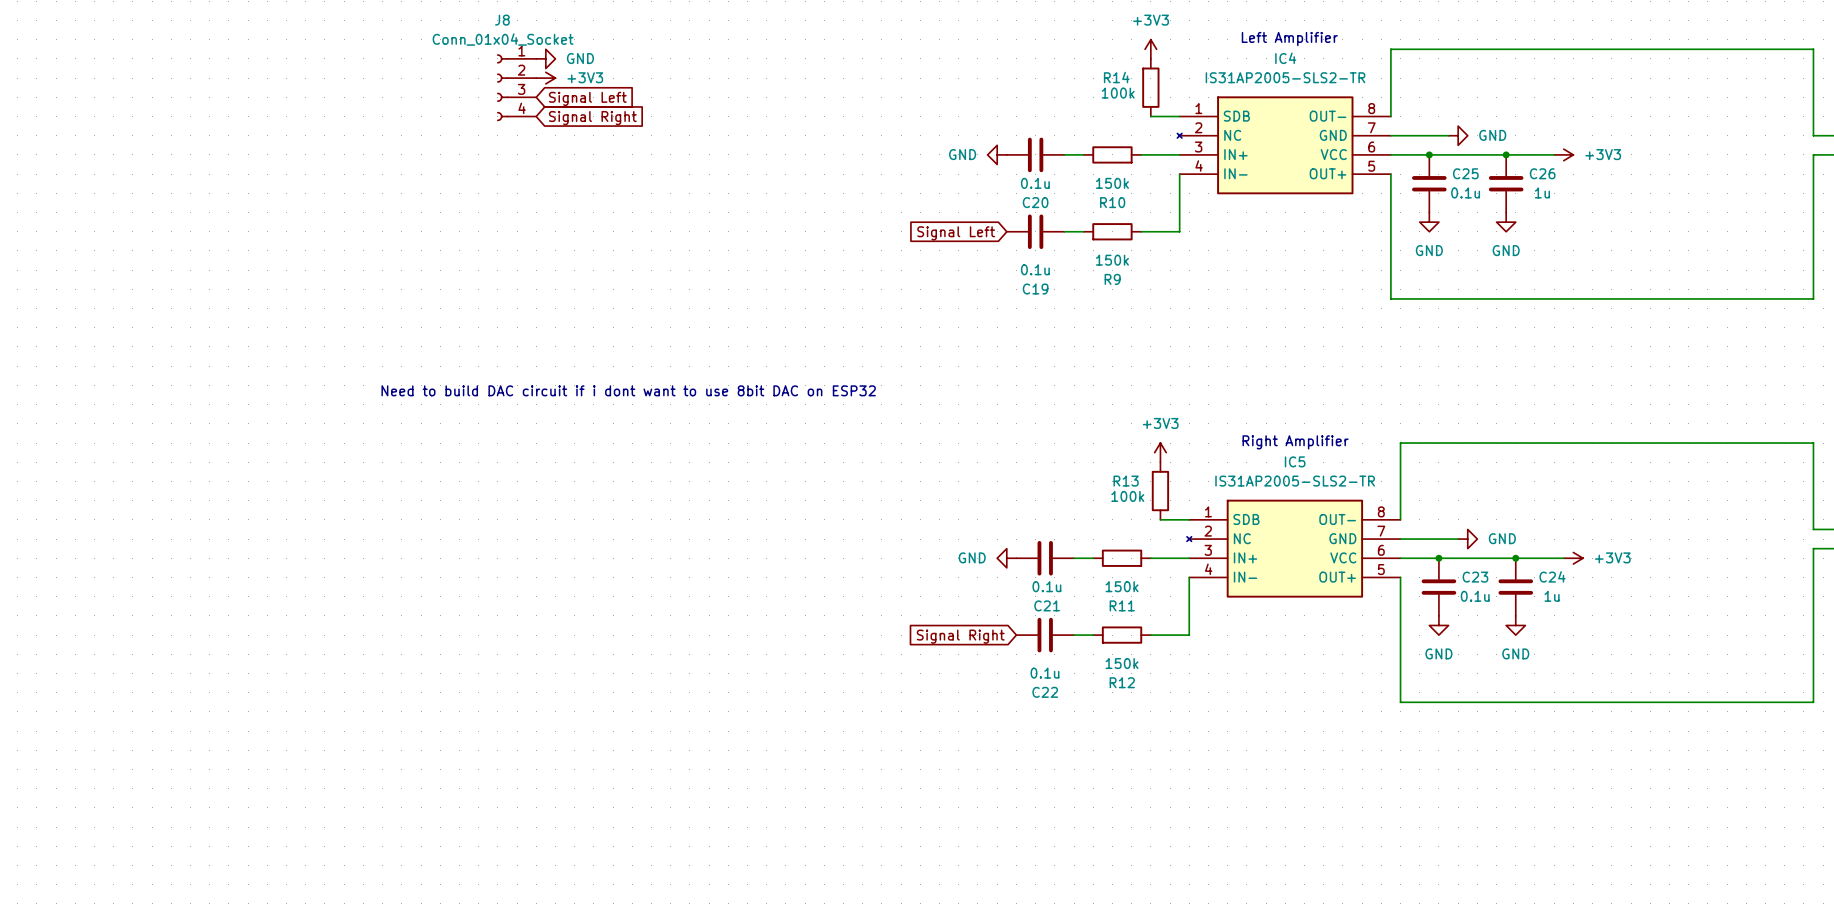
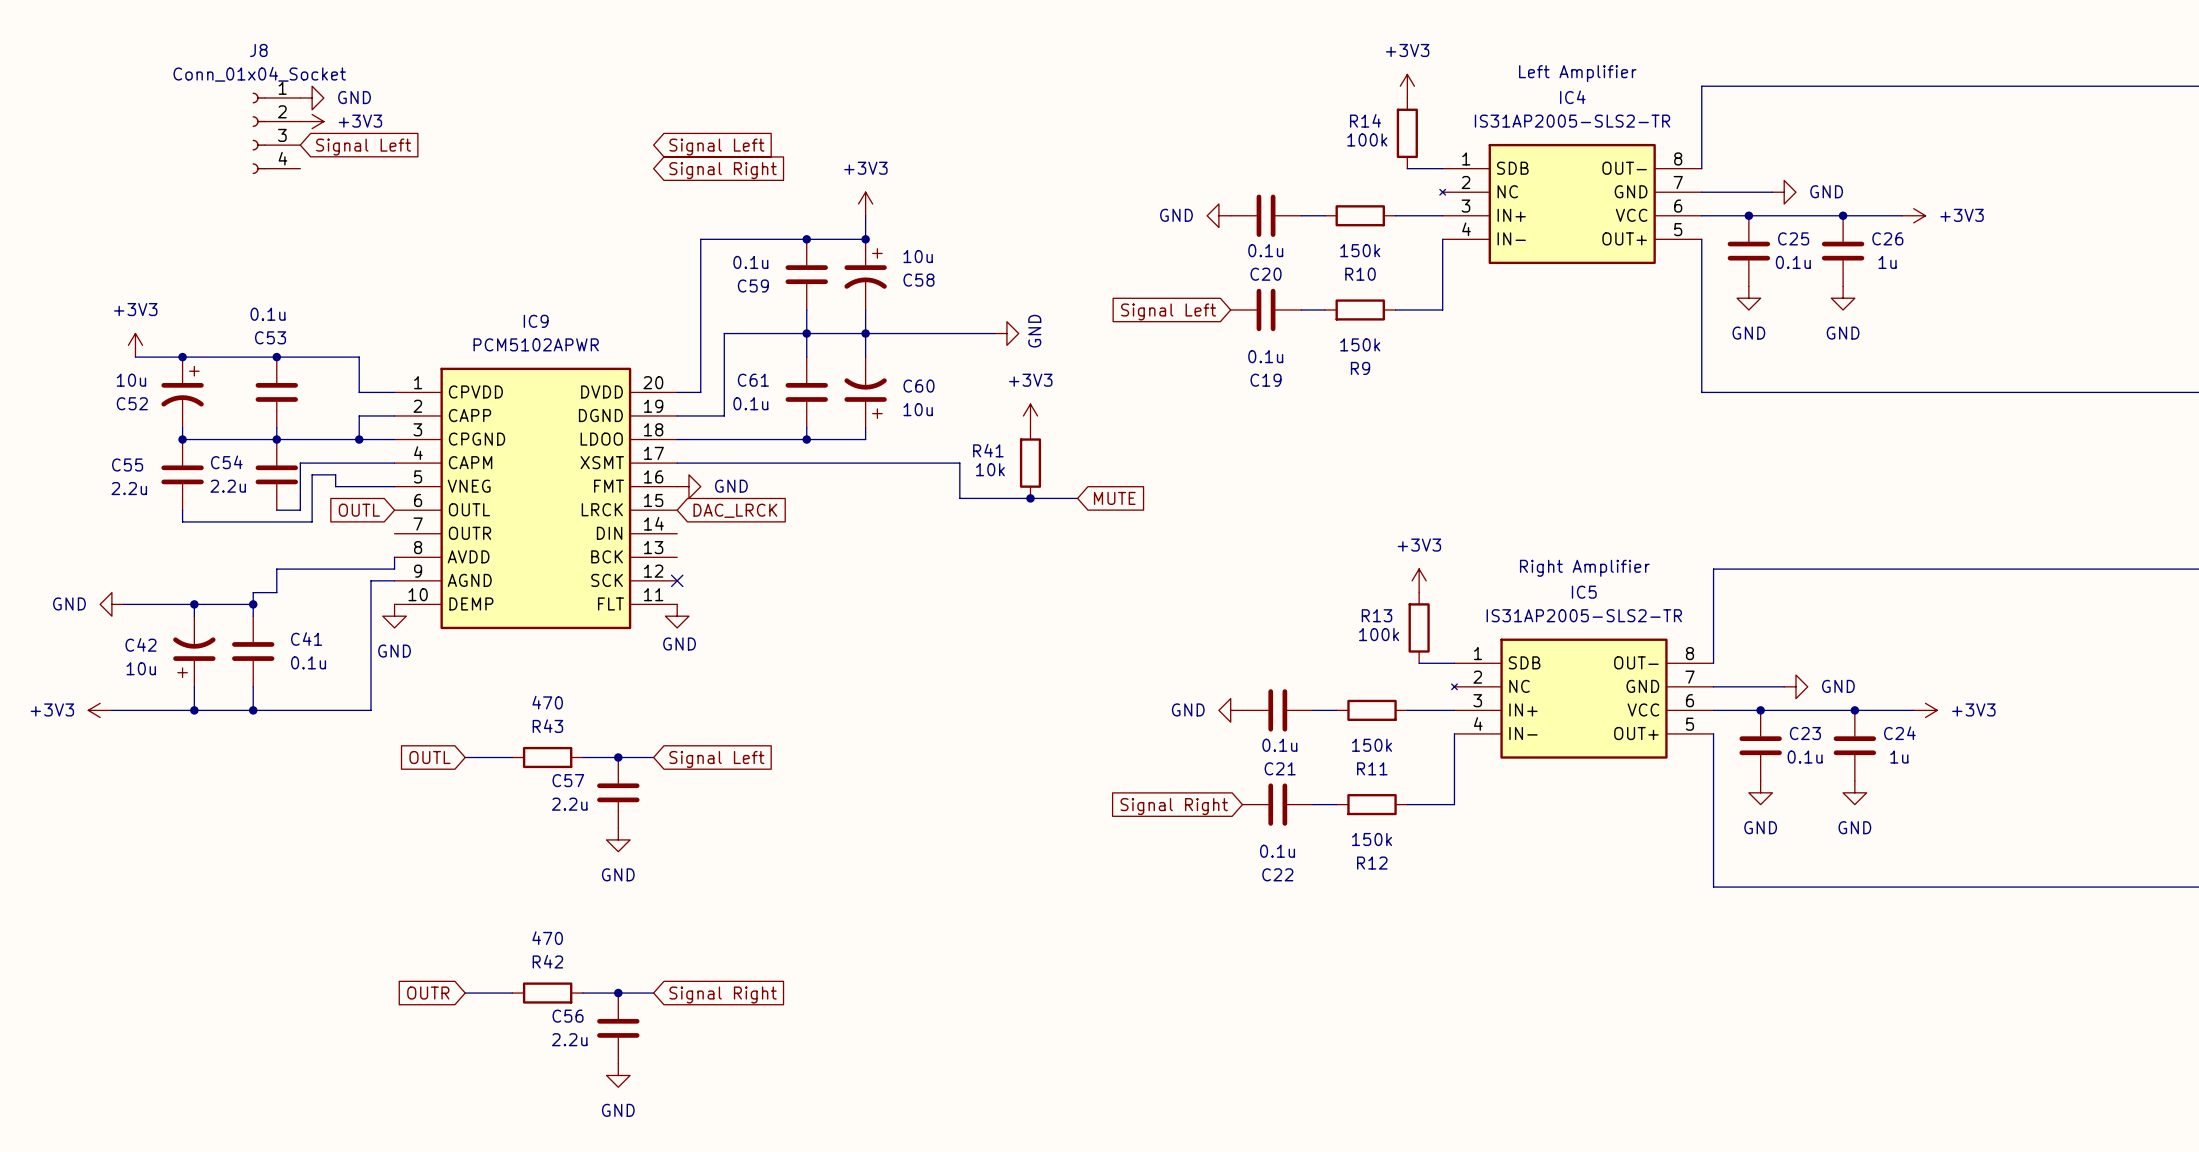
power symbol: none -> GND (312, 98)
power symbol: GND (545, 58) -> none
power symbol: none -> +3V3 (312, 121)
power symbol: +3V3 (545, 78) -> none
J8 position: (516, 87) -> (276, 133)
global label: none -> Signal Left (363, 147)
power symbol: none -> +3V3 (865, 204)
wire: none -> (865, 215) (865, 239) (700, 239) (700, 392) (677, 392)
junction: none -> (806, 239)
junction: none -> (865, 239)
C59: none -> 0.1u (806, 274)
C58: none -> 10u (865, 274)
wire: none -> (806, 309) (806, 357)
wire: none -> (865, 309) (865, 357)
junction: none -> (806, 333)
junction: none -> (865, 333)
wire: none -> (995, 333) (724, 333) (724, 415) (677, 415)
power symbol: none -> GND (1006, 333)
power symbol: none -> +3V3 (135, 345)
wire: none -> (135, 357) (359, 357) (359, 392) (394, 392)
junction: none -> (182, 357)
junction: none -> (276, 357)
C52: none -> 10u (182, 392)
C53: none -> 0.1u (276, 392)
C61: none -> 0.1u (806, 392)
C60: none -> 10u (865, 392)
wire: none -> (394, 415) (359, 415) (359, 439)
power symbol: none -> +3V3 (1030, 415)
wire: none -> (182, 427) (182, 439) (394, 439)
wire: none -> (276, 427) (276, 439)
wire: none -> (806, 427) (806, 439)
wire: none -> (865, 427) (865, 439) (677, 439)
junction: none -> (182, 439)
junction: none -> (276, 439)
junction: none -> (359, 439)
junction: none -> (806, 439)
wire: none -> (394, 463) (300, 463) (300, 510) (276, 510)
wire: none -> (677, 463) (959, 463) (959, 498) (1077, 498)
R41: none -> 10k (1030, 463)
C55: none -> 2.2u (182, 474)
C54: none -> 2.2u (276, 474)
wire: none -> (394, 486) (335, 486) (335, 474) (312, 474) (312, 521) (182, 521) (182, 510)
power symbol: none -> GND (688, 486)
IC9: none -> PCM5102APWR (535, 498)
junction: none -> (1030, 498)
global label: none -> MUTE (1114, 498)
text: Need to build DAC circuit if i dont want to use 8bit DAC on ESP32 (628, 390) -> none
global label: none -> OUTL (359, 510)
global label: none -> DAC_LRCK (735, 510)
wire: none -> (394, 557) (394, 569) (276, 569) (276, 592) (253, 592) (253, 616)
wire: none -> (394, 580) (371, 580) (371, 710) (111, 710)
no-connect mark: none -> (677, 580)
power symbol: none -> GND (111, 604)
wire: none -> (123, 604) (253, 604)
wire: none -> (194, 604) (194, 616)
junction: none -> (194, 604)
junction: none -> (253, 604)
power symbol: none -> GND (394, 616)
power symbol: none -> GND (677, 616)
C42: none -> 10u (194, 651)
C41: none -> 0.1u (253, 651)
wire: none -> (194, 686) (194, 710)
wire: none -> (253, 686) (253, 710)
power symbol: none -> +3V3 (100, 710)
junction: none -> (194, 710)
junction: none -> (253, 710)
global label: none -> OUTL (430, 757)
wire: none -> (465, 757) (512, 757)
R43: none -> 470 (547, 757)
wire: none -> (582, 757) (653, 757)
junction: none -> (618, 757)
global label: none -> Signal Left (716, 759)
C57: none -> 2.2u (618, 792)
power symbol: none -> GND (618, 839)
global label: none -> OUTR (428, 993)
wire: none -> (465, 993) (512, 993)
R42: none -> 470 (547, 993)
wire: none -> (582, 993) (653, 993)
junction: none -> (618, 993)
global label: none -> Signal Right (723, 995)
C56: none -> 2.2u (618, 1028)
power symbol: none -> GND (618, 1075)

